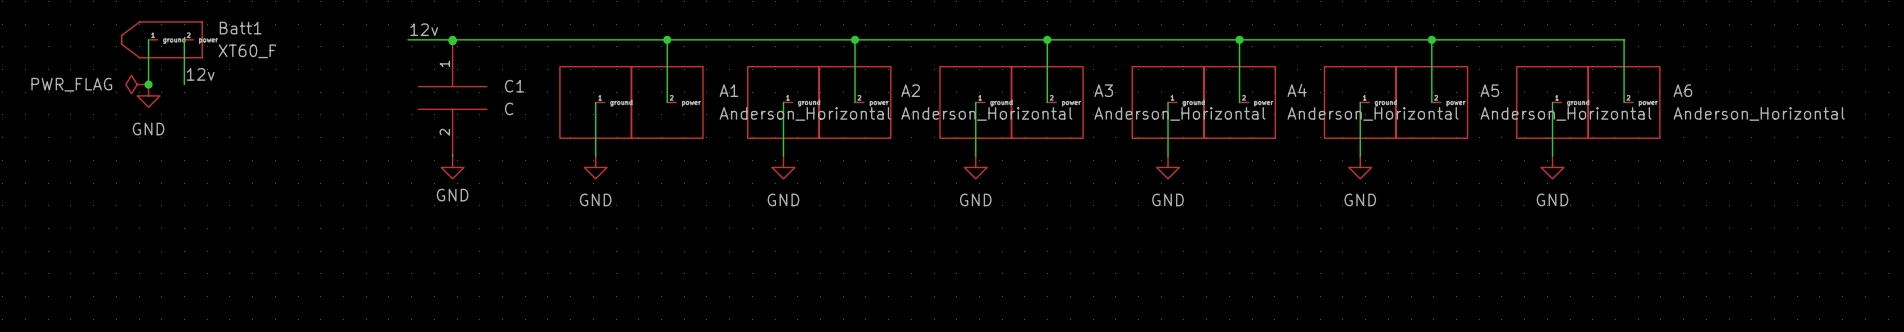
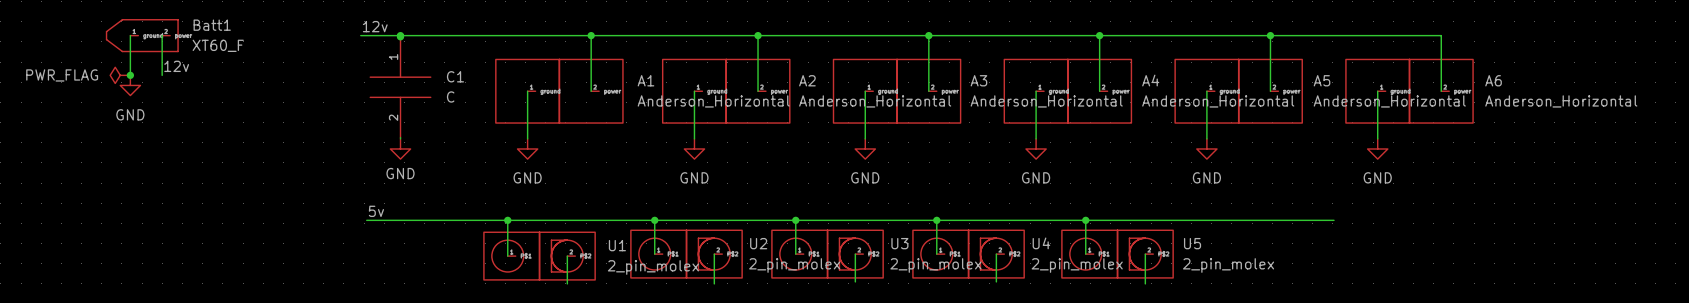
label: none -> 5v (376, 211)
wire: none -> (366, 220) (1334, 220)
wire: none -> (507, 220) (507, 256)
junction: none -> (507, 220)
wire: none -> (654, 220) (654, 254)
junction: none -> (654, 220)
wire: none -> (795, 220) (795, 254)
junction: none -> (795, 220)
wire: none -> (936, 220) (936, 254)
junction: none -> (936, 220)
wire: none -> (1085, 220) (1085, 254)
junction: none -> (1085, 220)
U2: none -> 2_pin_molex (686, 254)
wire: none -> (714, 254) (714, 283)
U3: none -> 2_pin_molex (827, 254)
wire: none -> (855, 254) (855, 281)
U4: none -> 2_pin_molex (968, 254)
wire: none -> (996, 254) (996, 281)
U5: none -> 2_pin_molex (1117, 254)
wire: none -> (1145, 254) (1145, 283)
U1: none -> 2_pin_molex (539, 256)
wire: none -> (567, 256) (567, 283)

